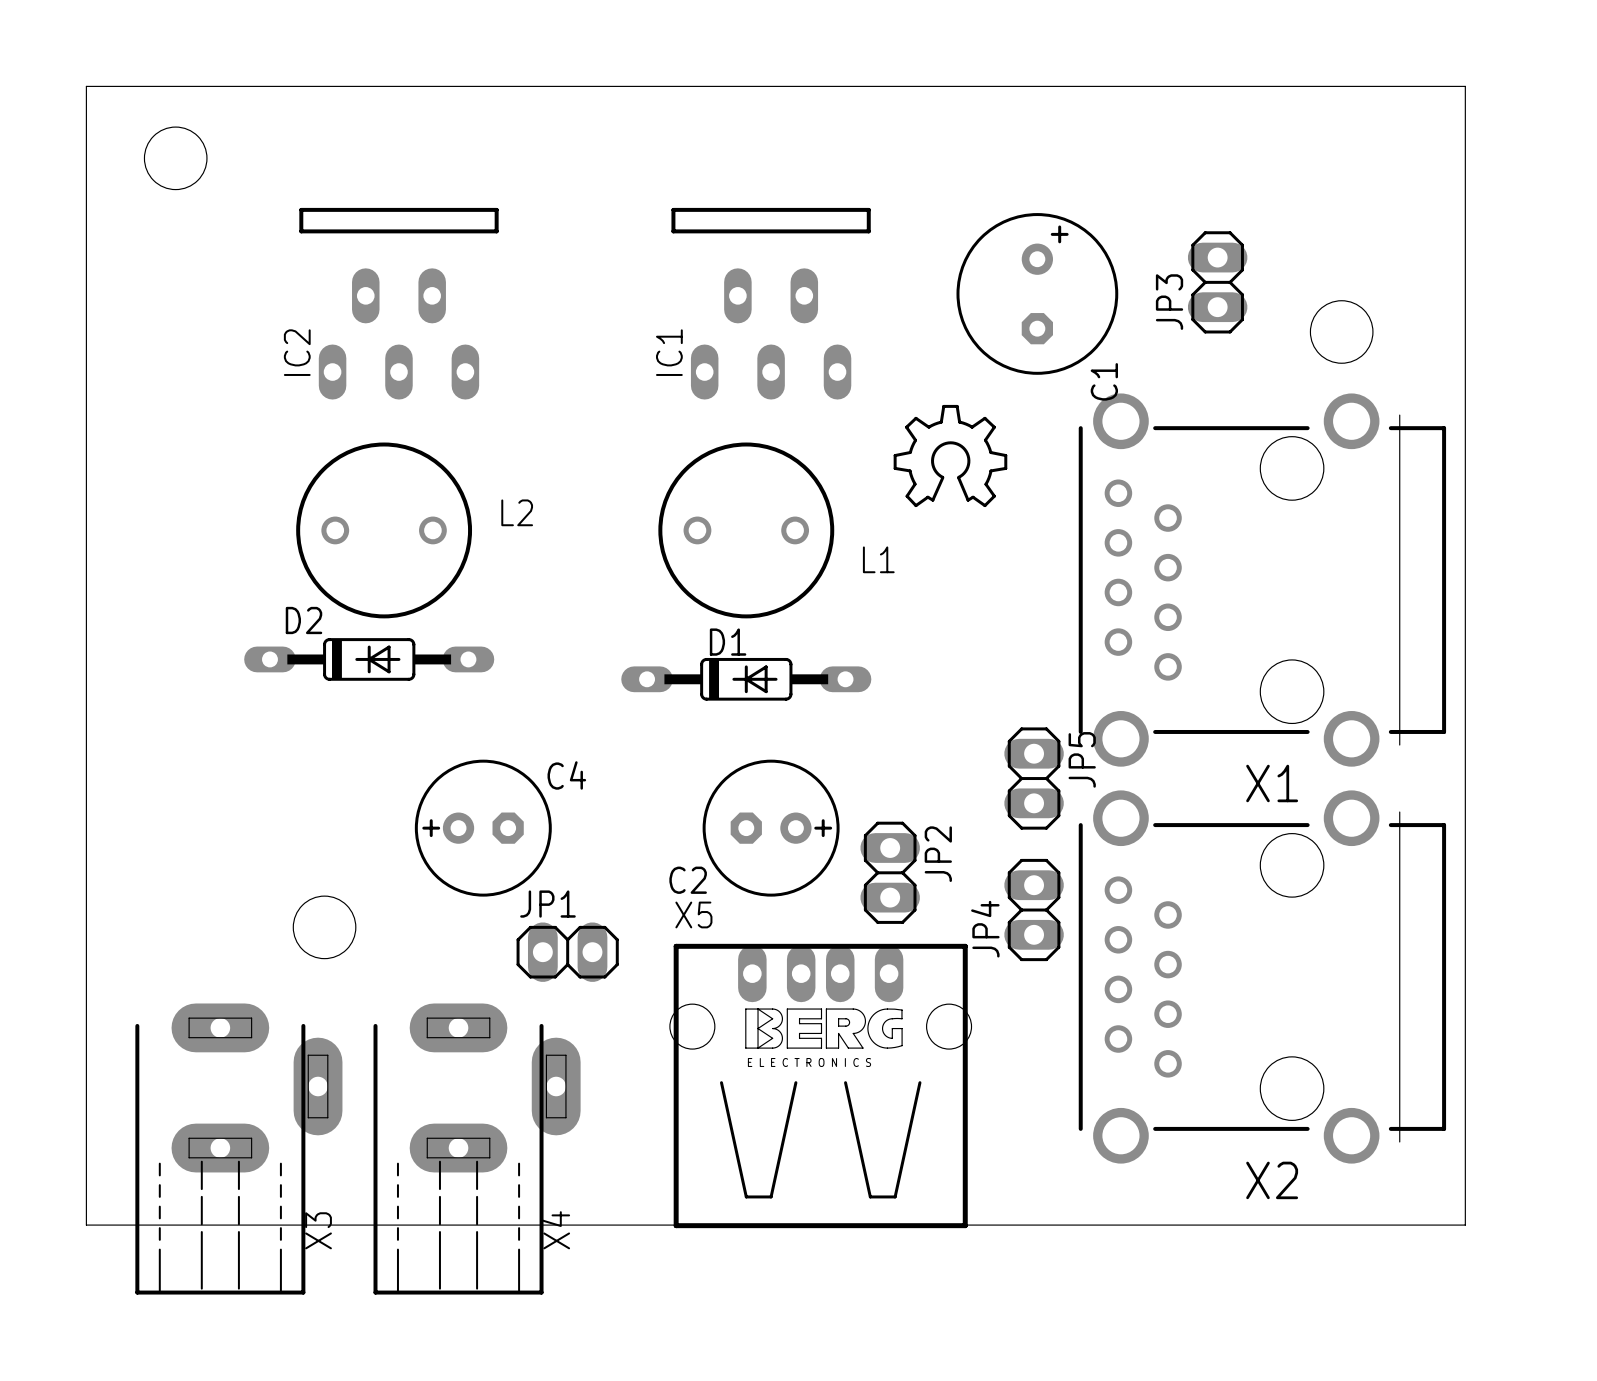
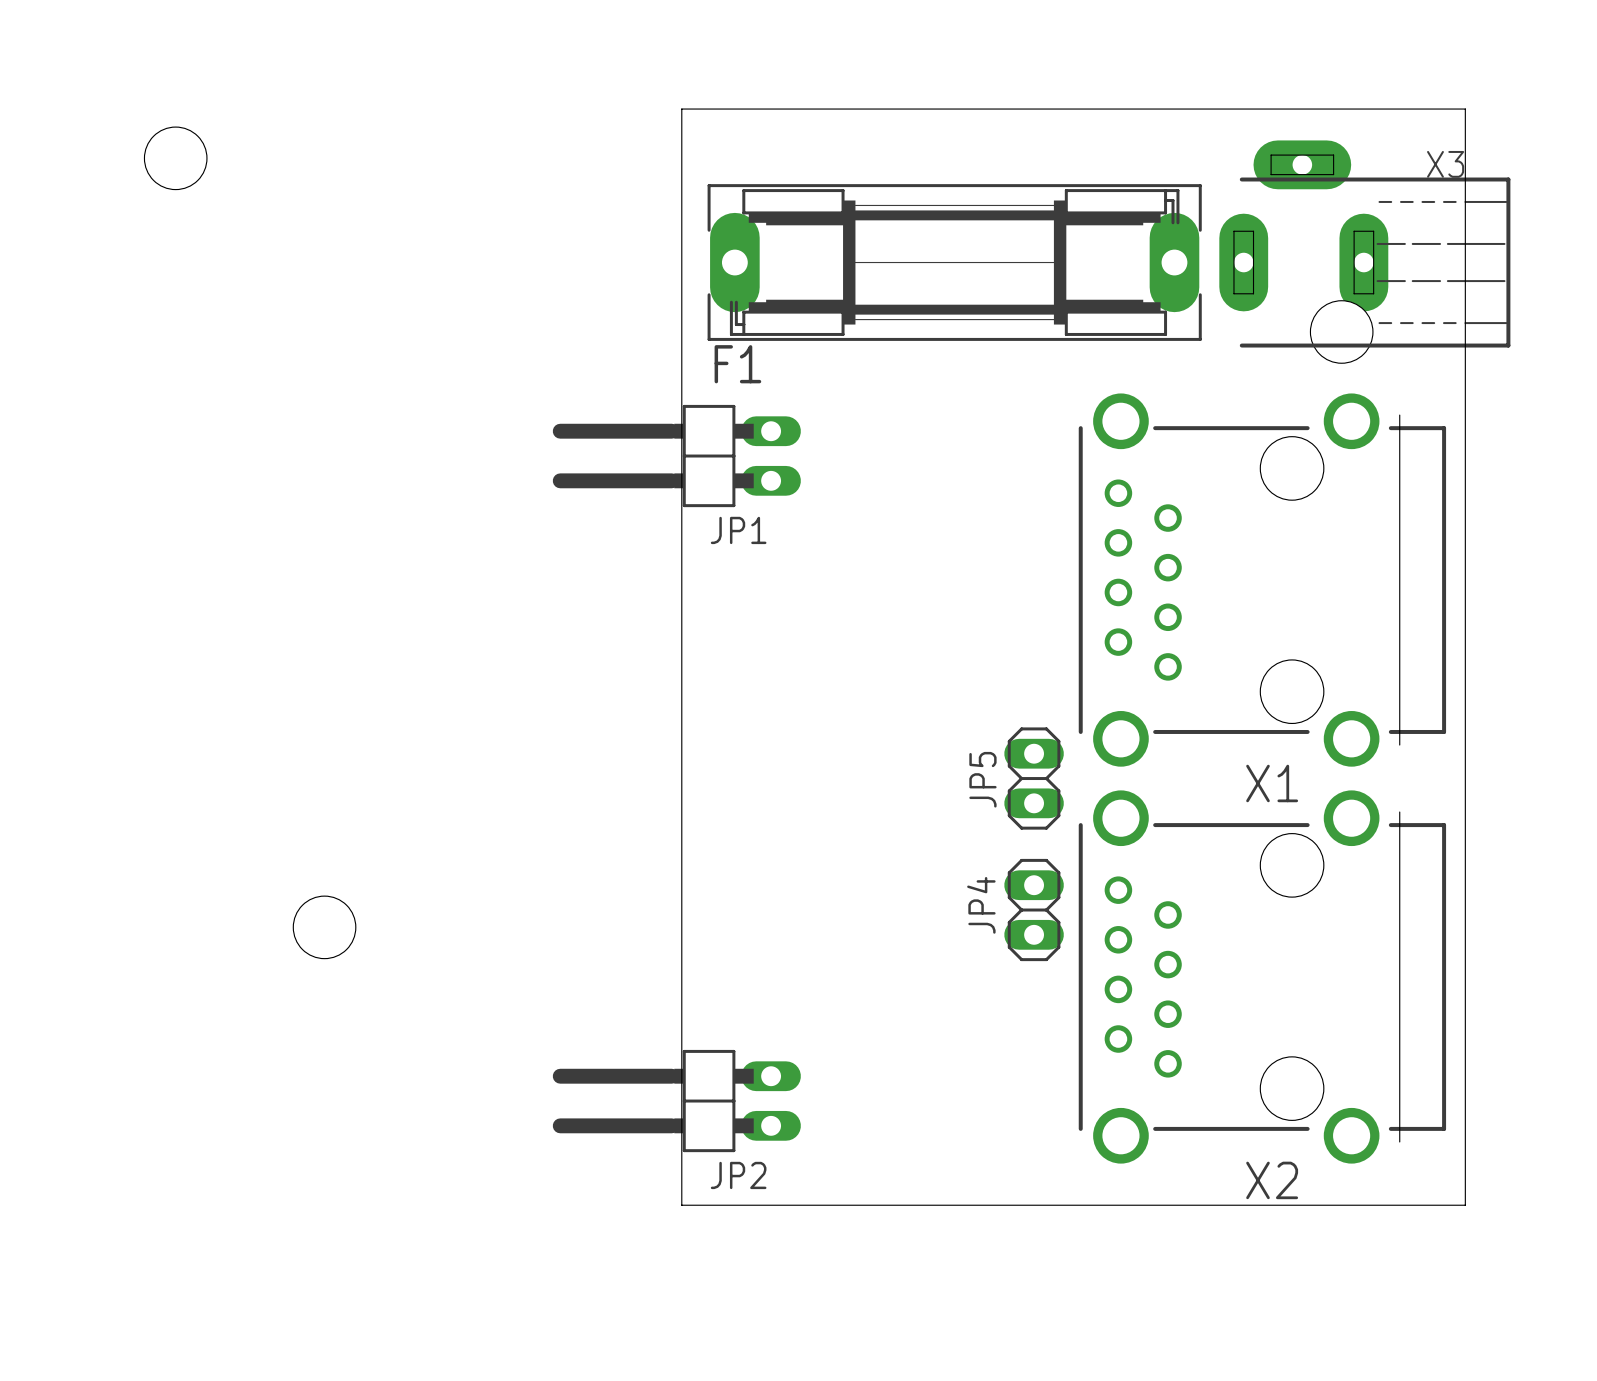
board edge: (1465, 109) (1465, 86) (86, 86) (86, 1225) (1465, 1225) (1465, 1205) -> (1465, 109) (681, 109) (681, 1205) (1465, 1205)
F1: none -> (954, 262)
JP3: (1217, 282) -> none
C1: (1037, 293) -> none
IC2: (398, 303) -> none
IC1: (771, 303) -> none
drawing: [893, 404, 1008, 508] -> none
L2: (384, 530) -> none
L1: (746, 530) -> none
D2: (369, 659) -> none
D1: (746, 679) -> none
JP5 name position: JP5 (1082, 759) -> JP5 (982, 779)
JP2 footprint: [860, 821, 920, 924] -> [552, 1049, 801, 1153]
C4: (483, 828) -> none
C2: (771, 828) -> none
JP2 name position: JP2 (938, 854) -> JP2 (738, 1175)
JP1 name position: JP1 (547, 904) -> JP1 (738, 530)
JP1 footprint: [516, 922, 619, 982] -> [552, 404, 801, 508]
JP4 name position: JP4 (985, 929) -> JP4 (981, 905)
X5: (820, 1085) -> none
X3 rotation: 0° (238, 1149) -> 90° counterclockwise (1364, 243)
X3 position: (238, 1149) -> (1364, 243)
X4: (477, 1149) -> none

